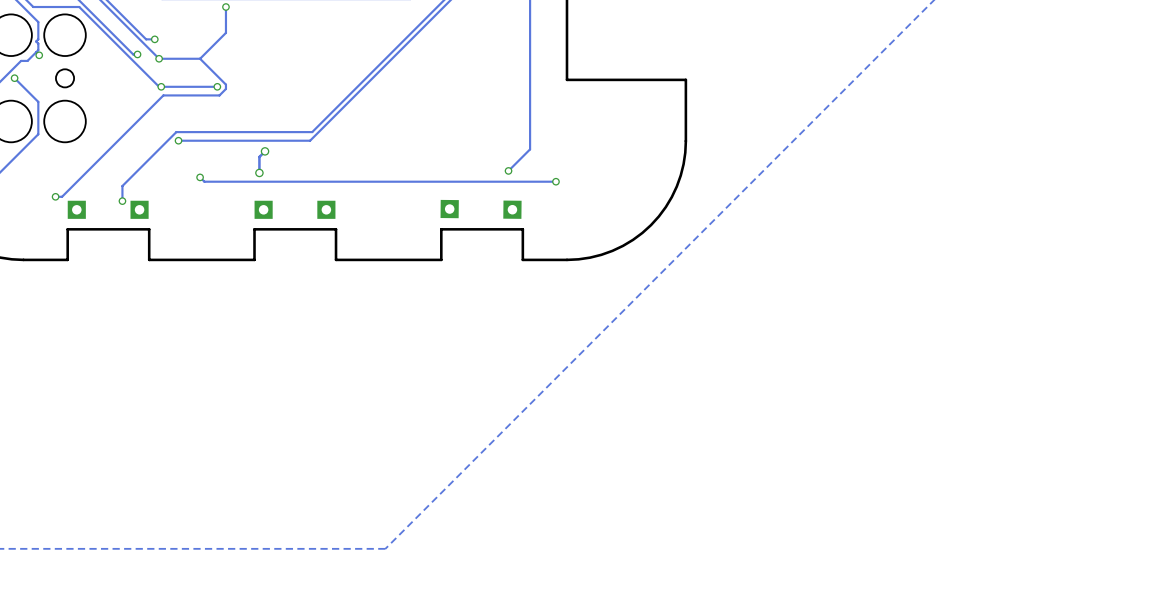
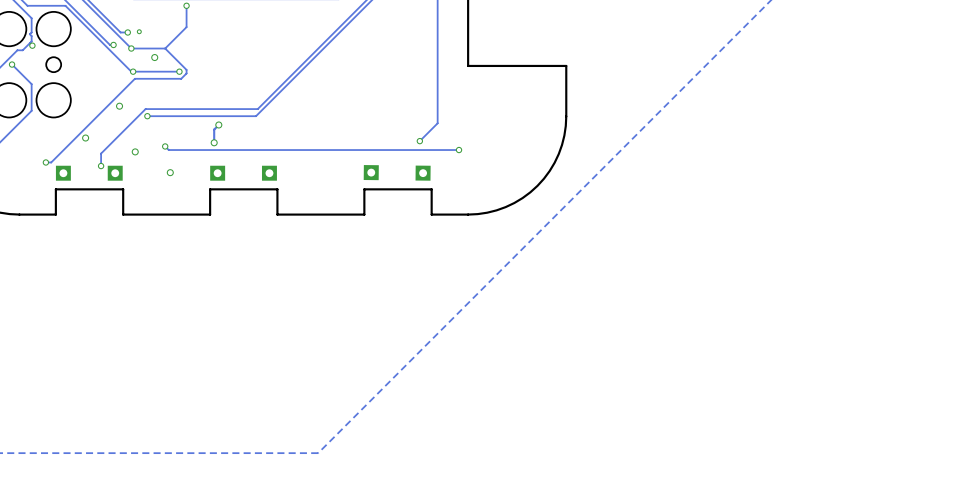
via: none -> (139, 31)
via: none -> (154, 57)
via: none -> (119, 106)
via: none -> (85, 138)
via: none -> (135, 151)
via: none -> (170, 172)

